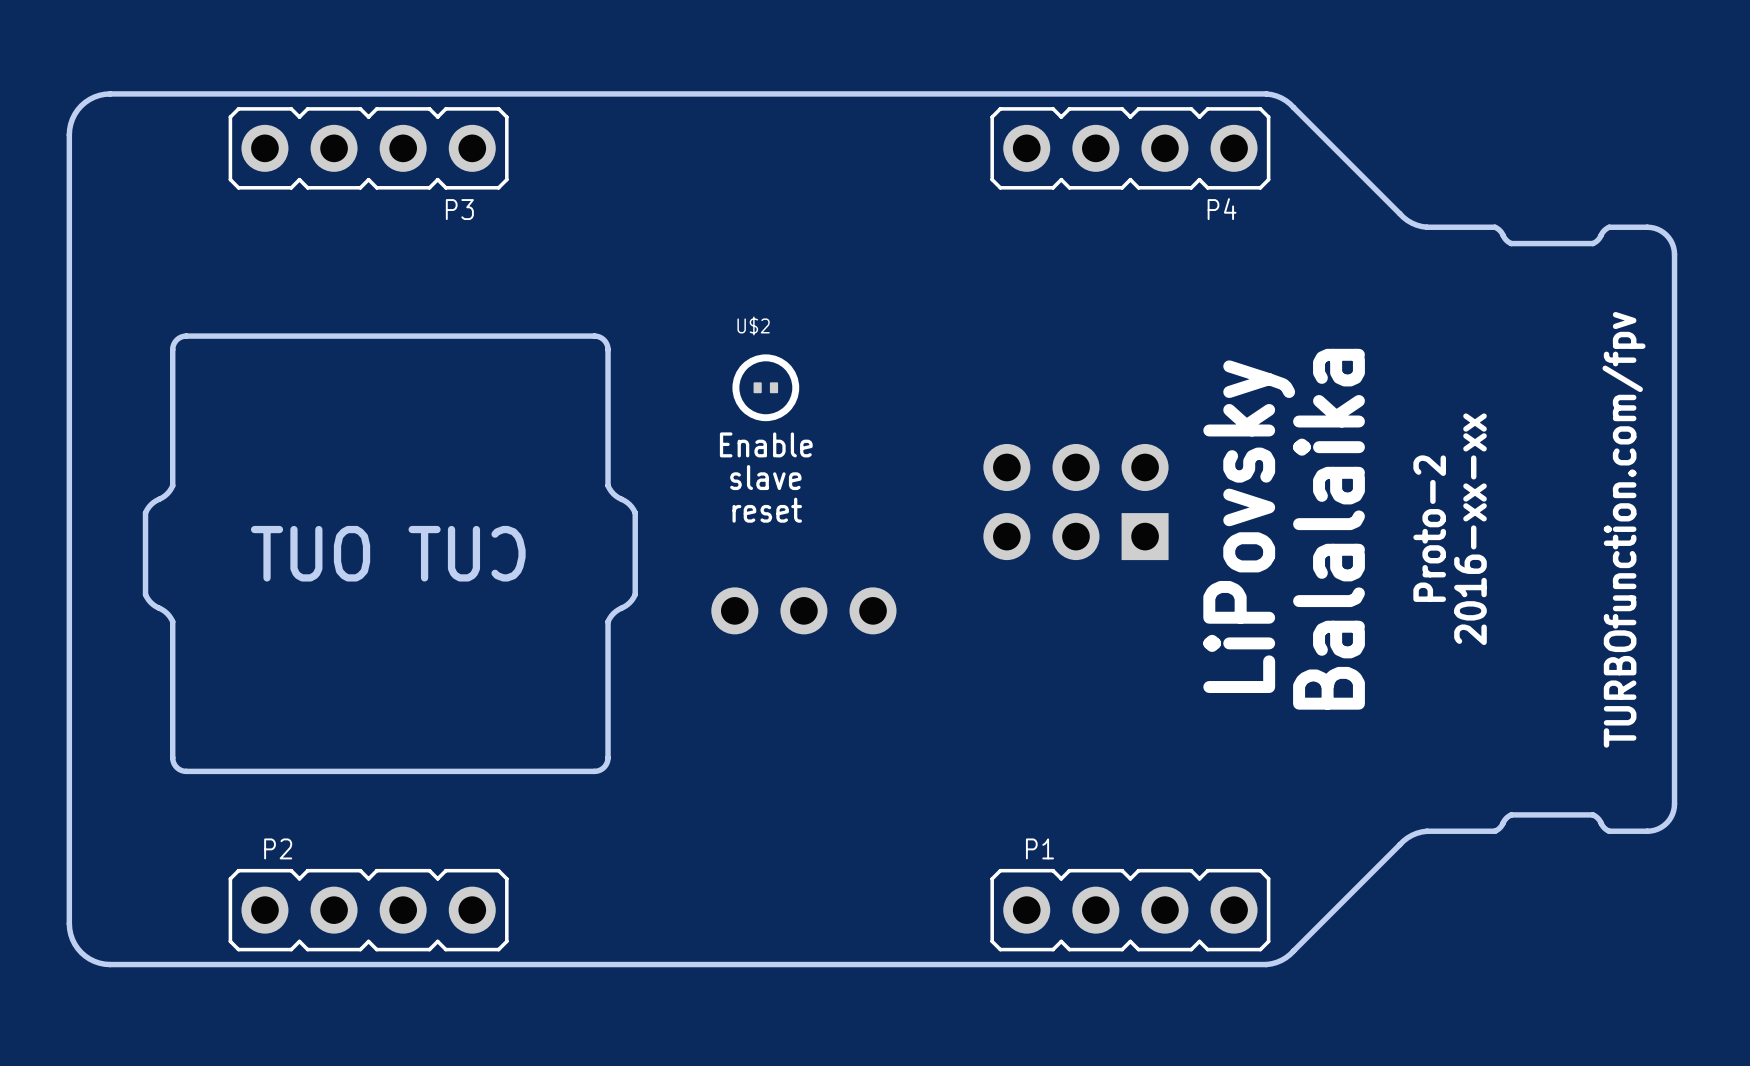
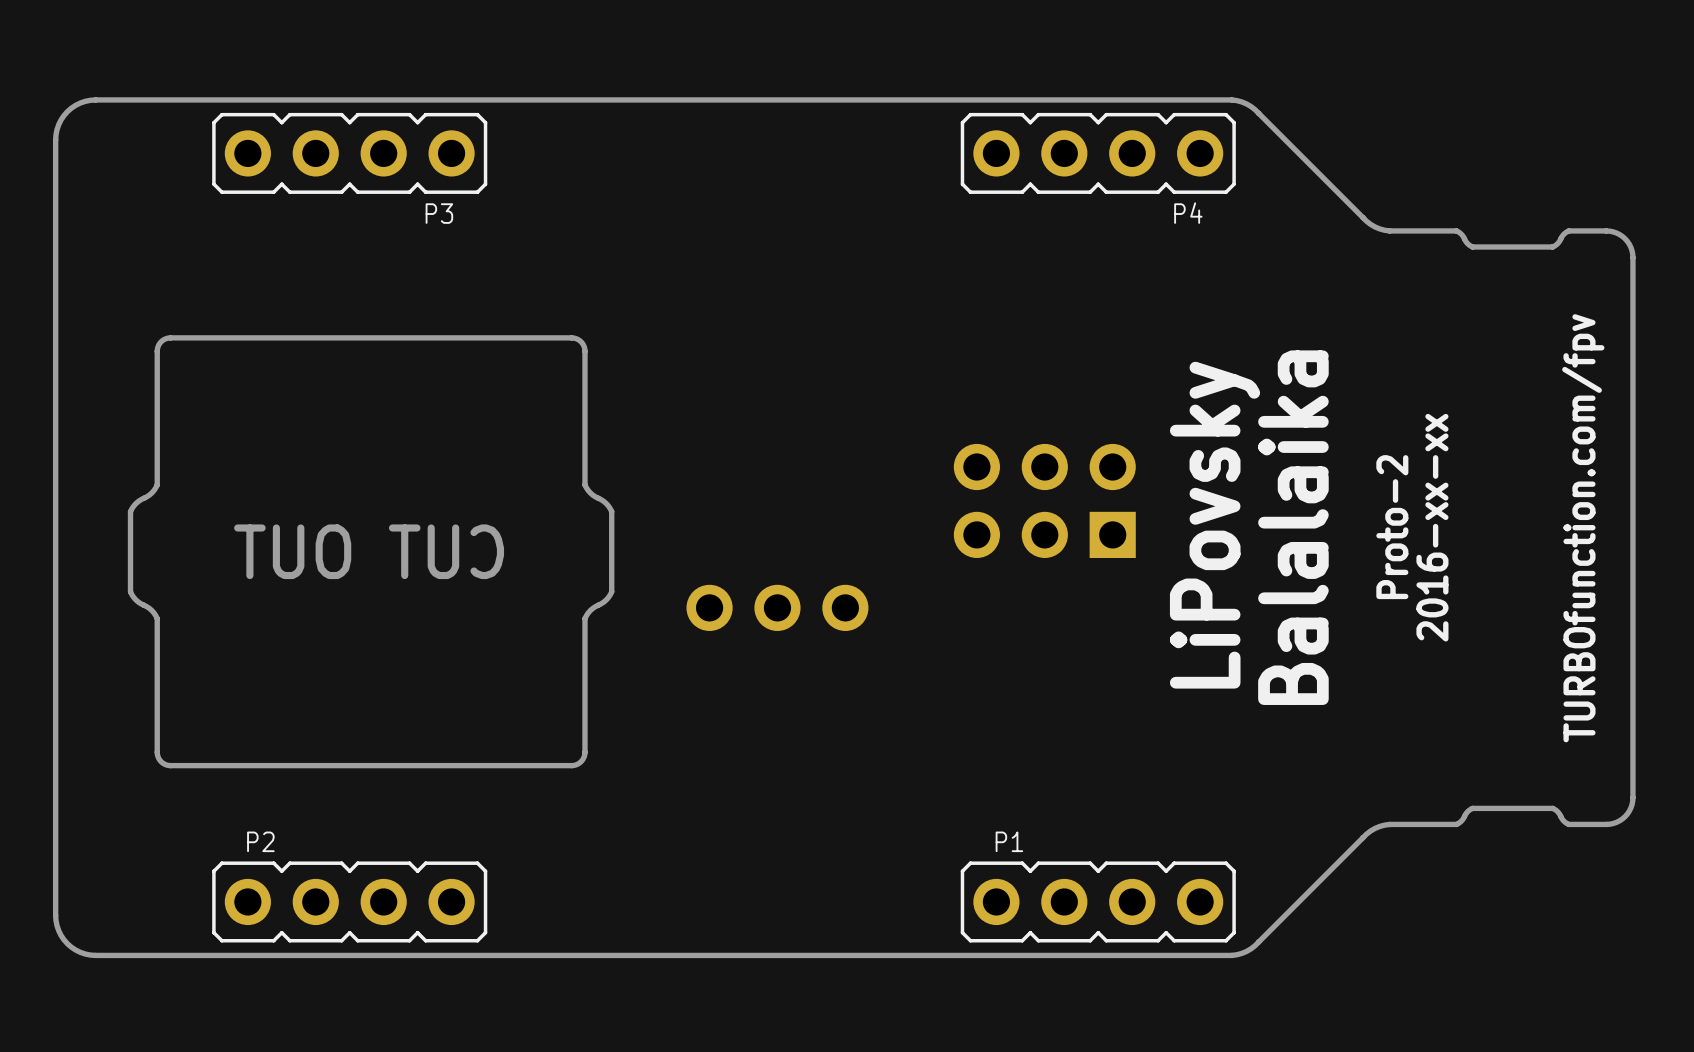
U$2: (765, 387) -> none
text: Enable (766, 444) -> none
text: slave (765, 477) -> none
text: reset (767, 510) -> none

